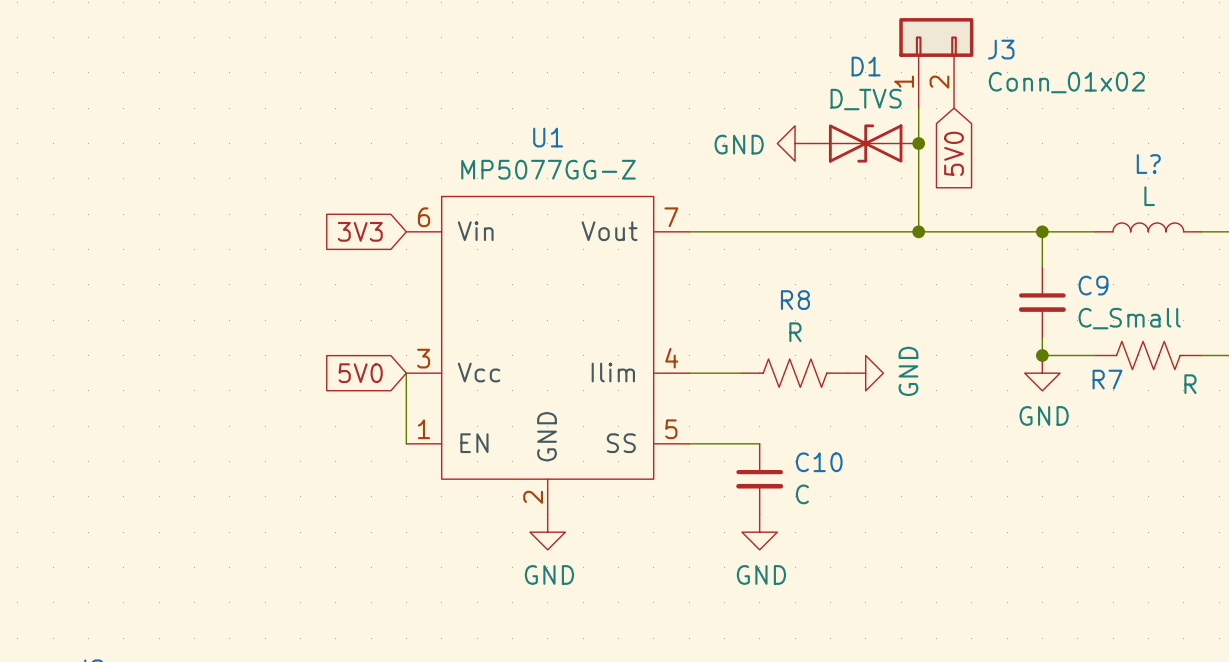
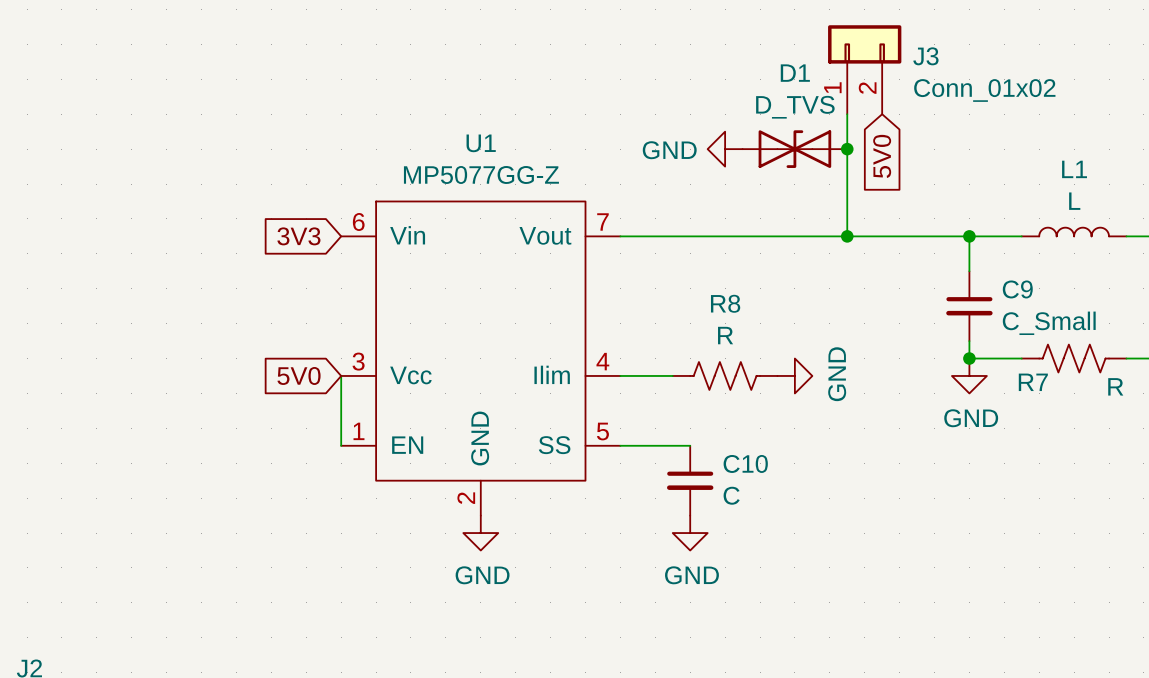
L? name: L? (1148, 164) -> L1 (1074, 169)

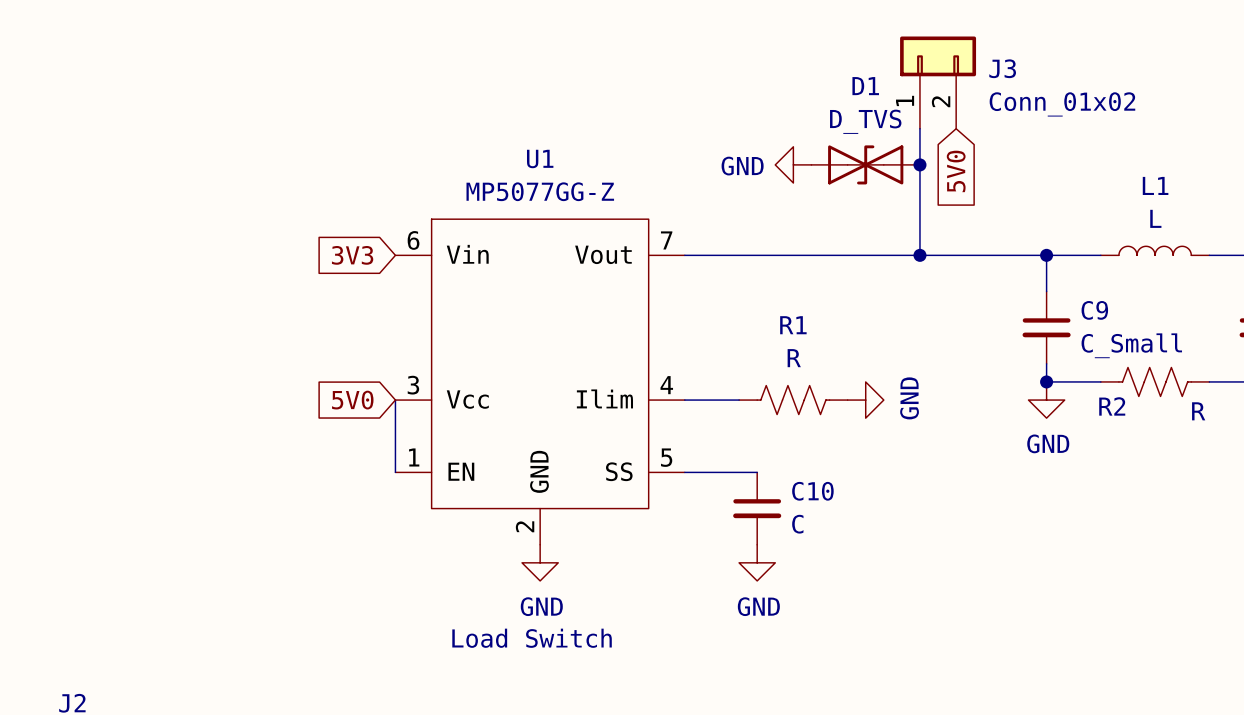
R8 name: R8 (725, 303) -> R1 (793, 325)
R7 name: R7 (1033, 382) -> R2 (1112, 406)
text: none -> Load Switch (532, 638)

